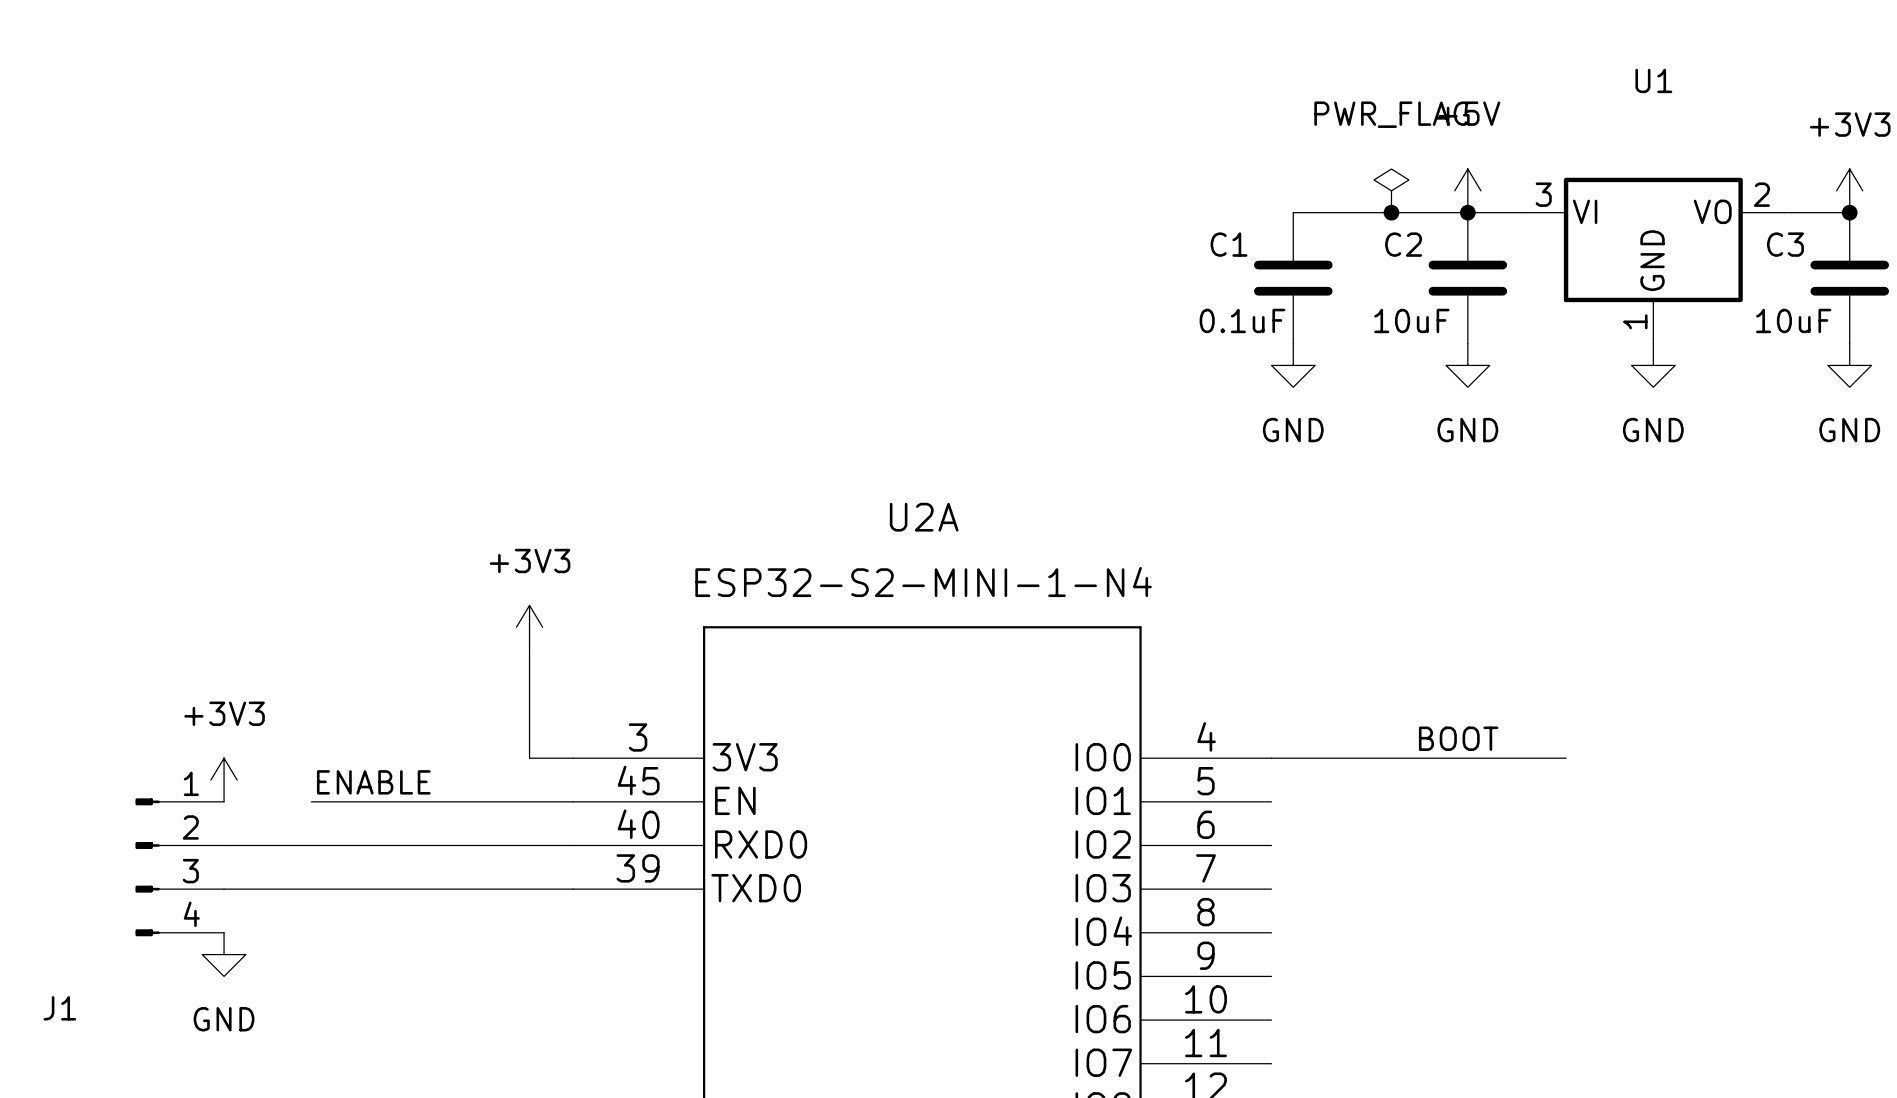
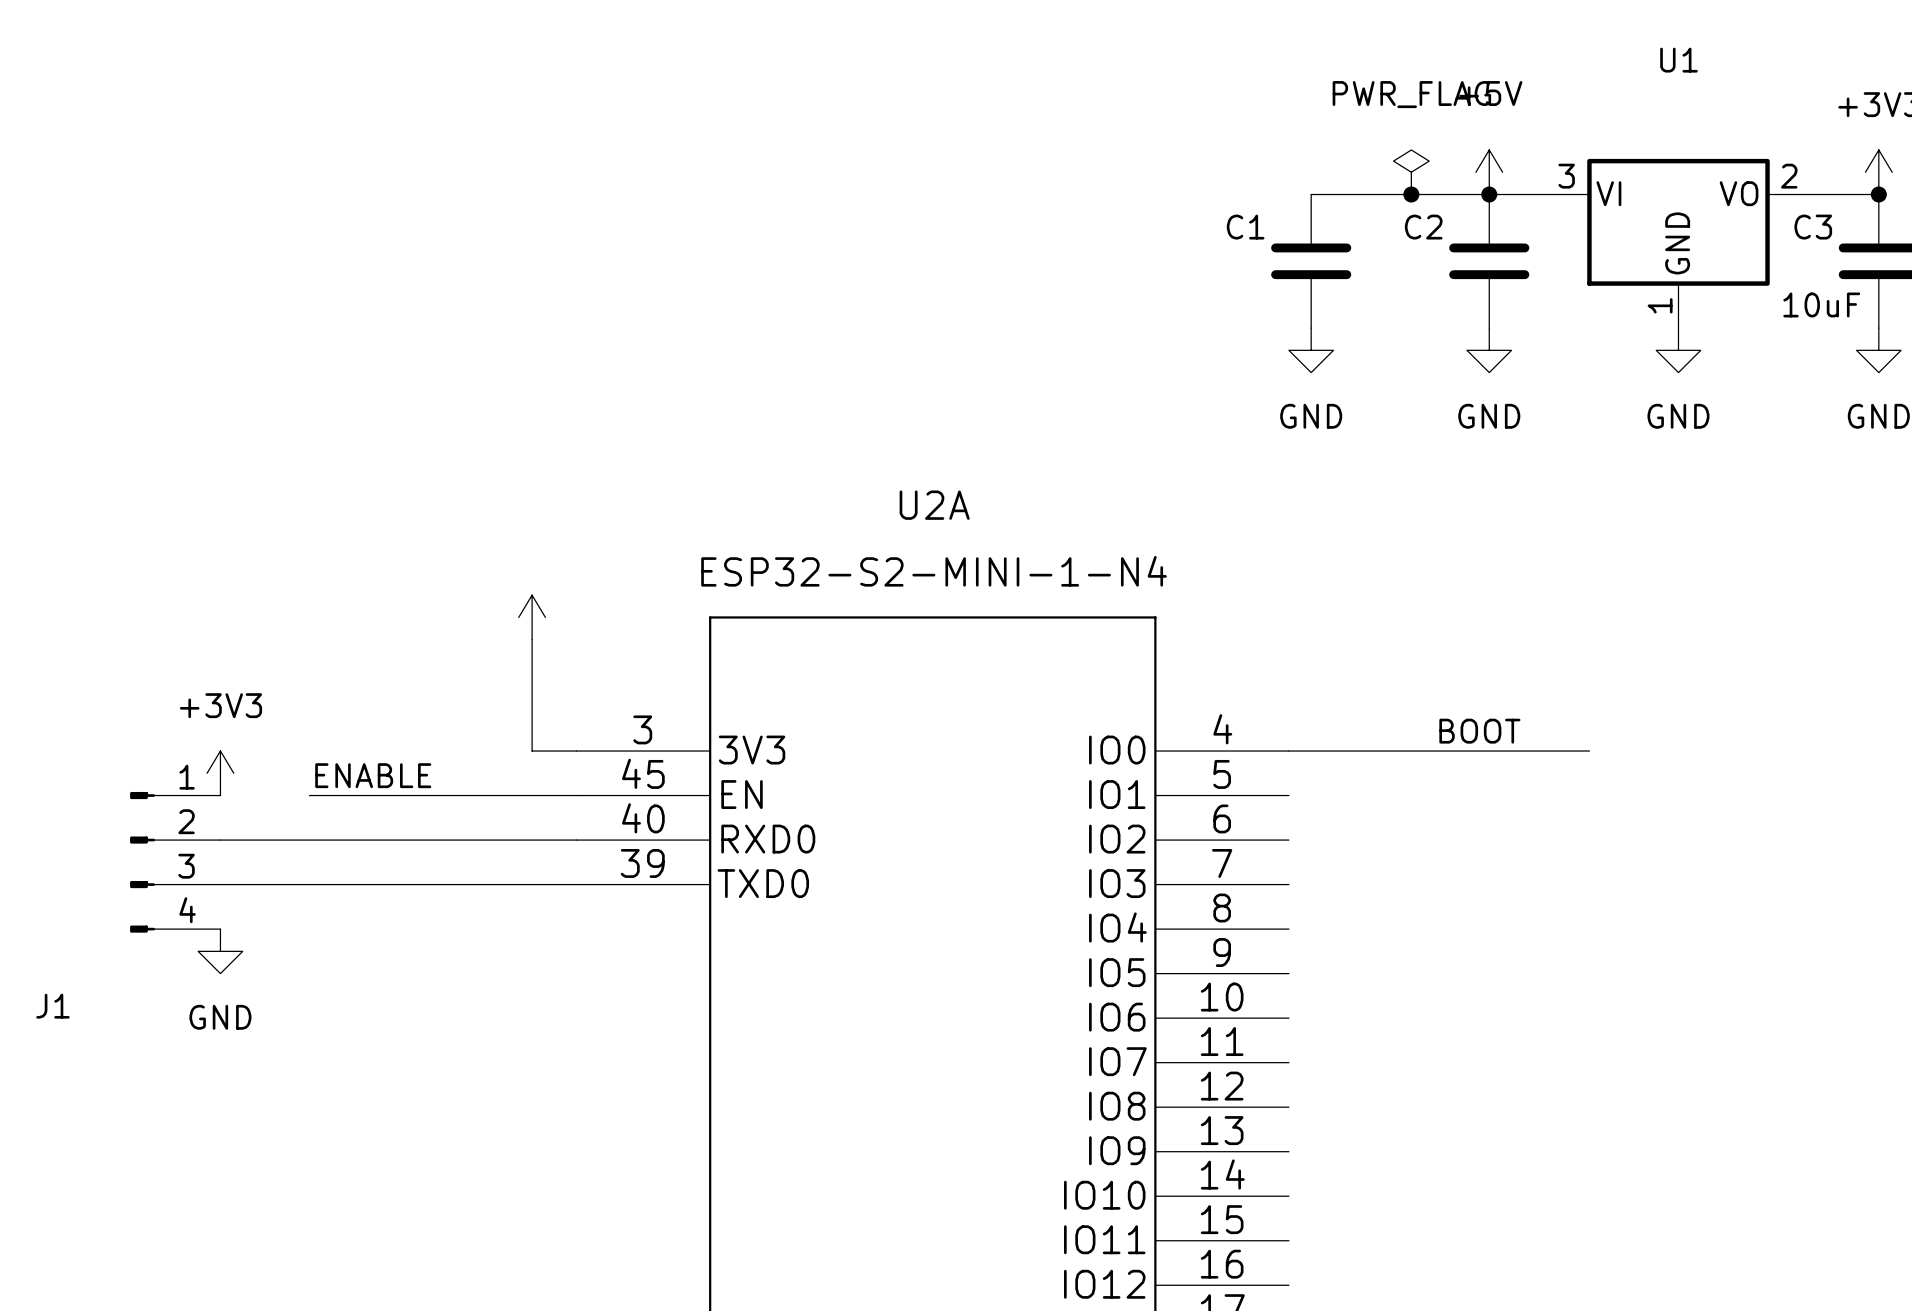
C1 value: 0.1uF (1242, 320) -> none
C2 value: 10uF (1411, 320) -> none
power symbol text: +3V3 (530, 561) -> none

